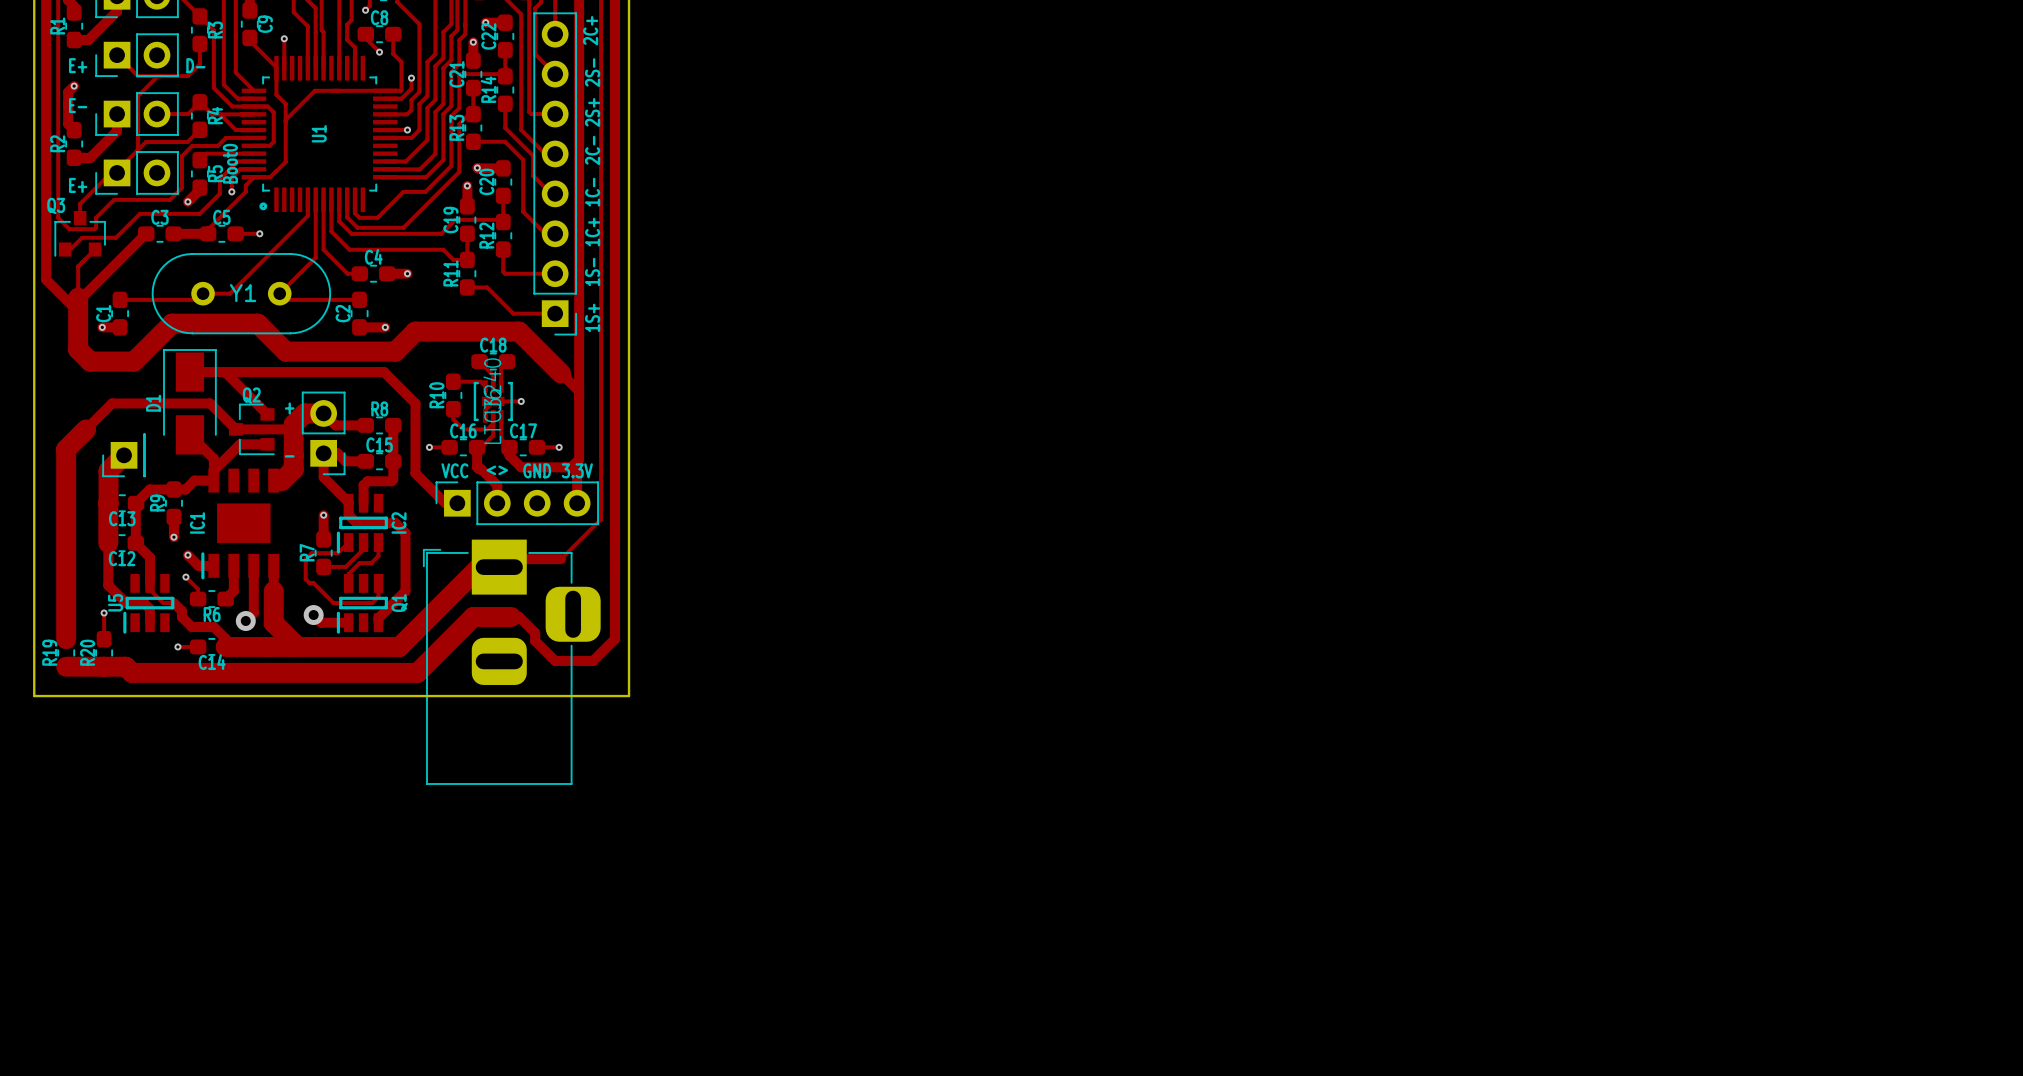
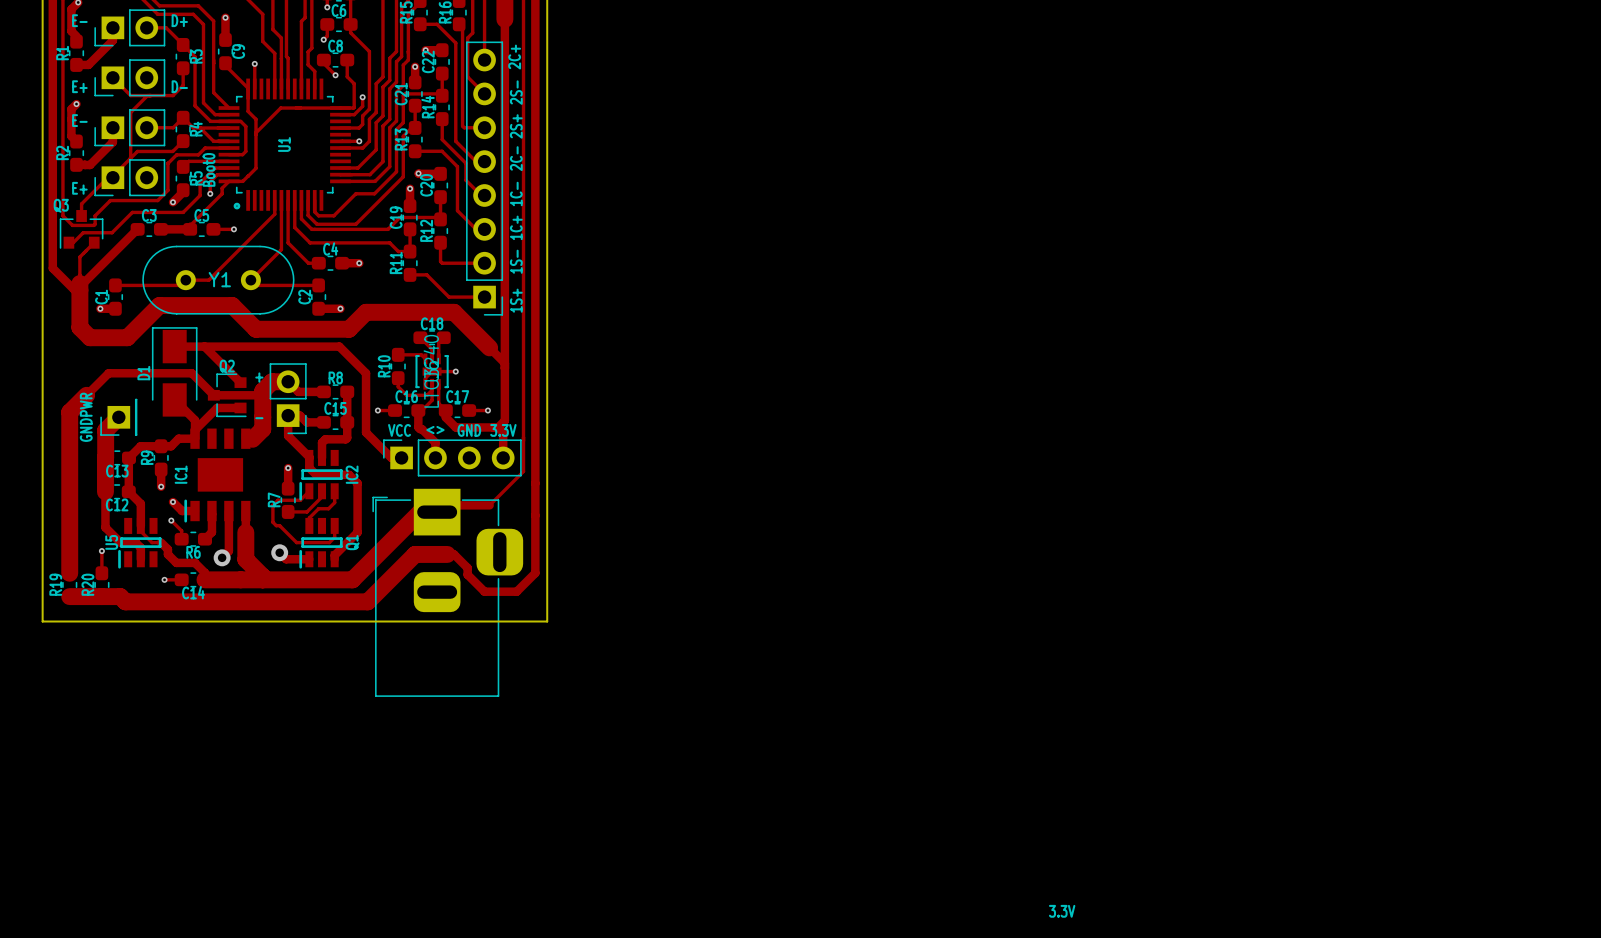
text: none -> GNDPWR (86, 417)
text: none -> 3.3V (1062, 911)

